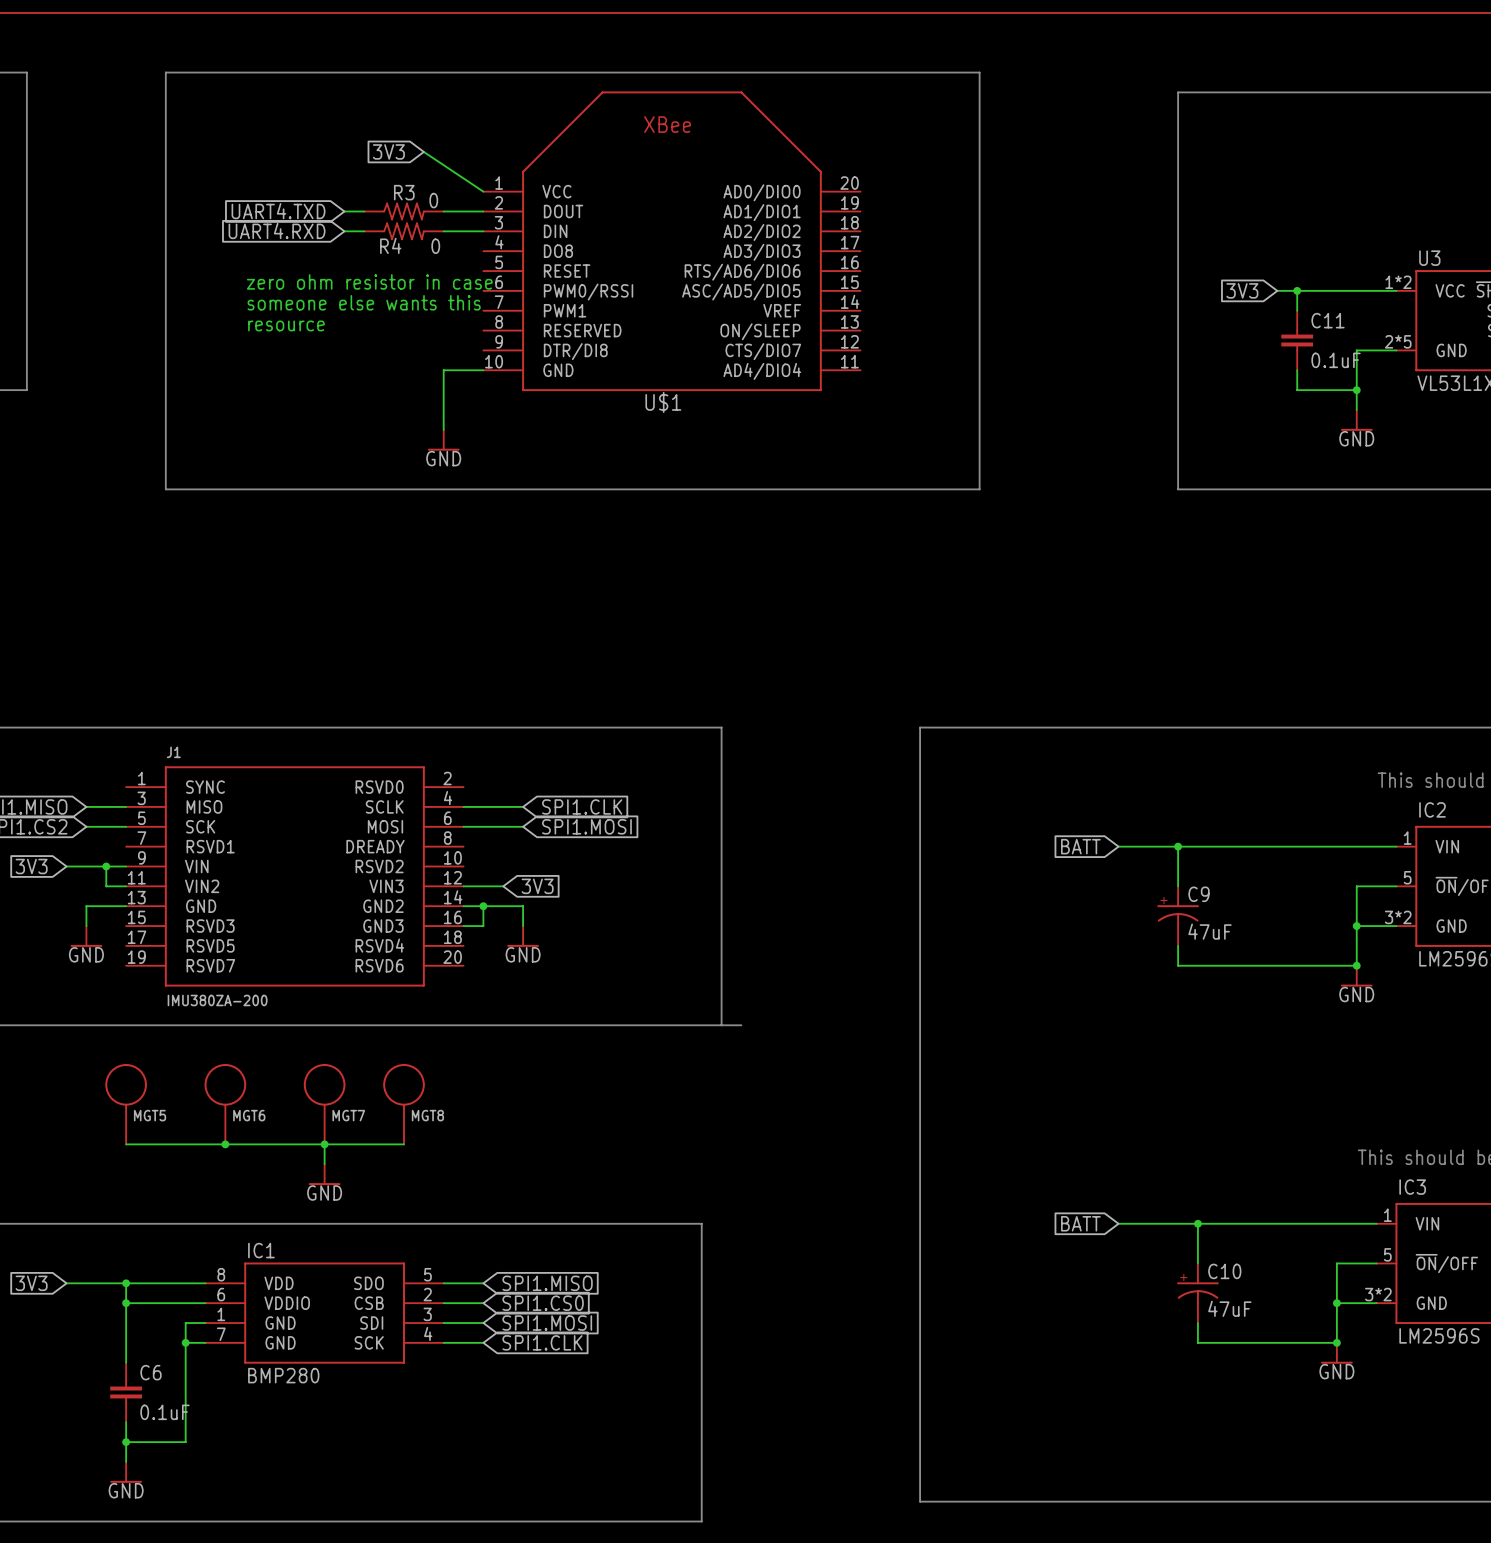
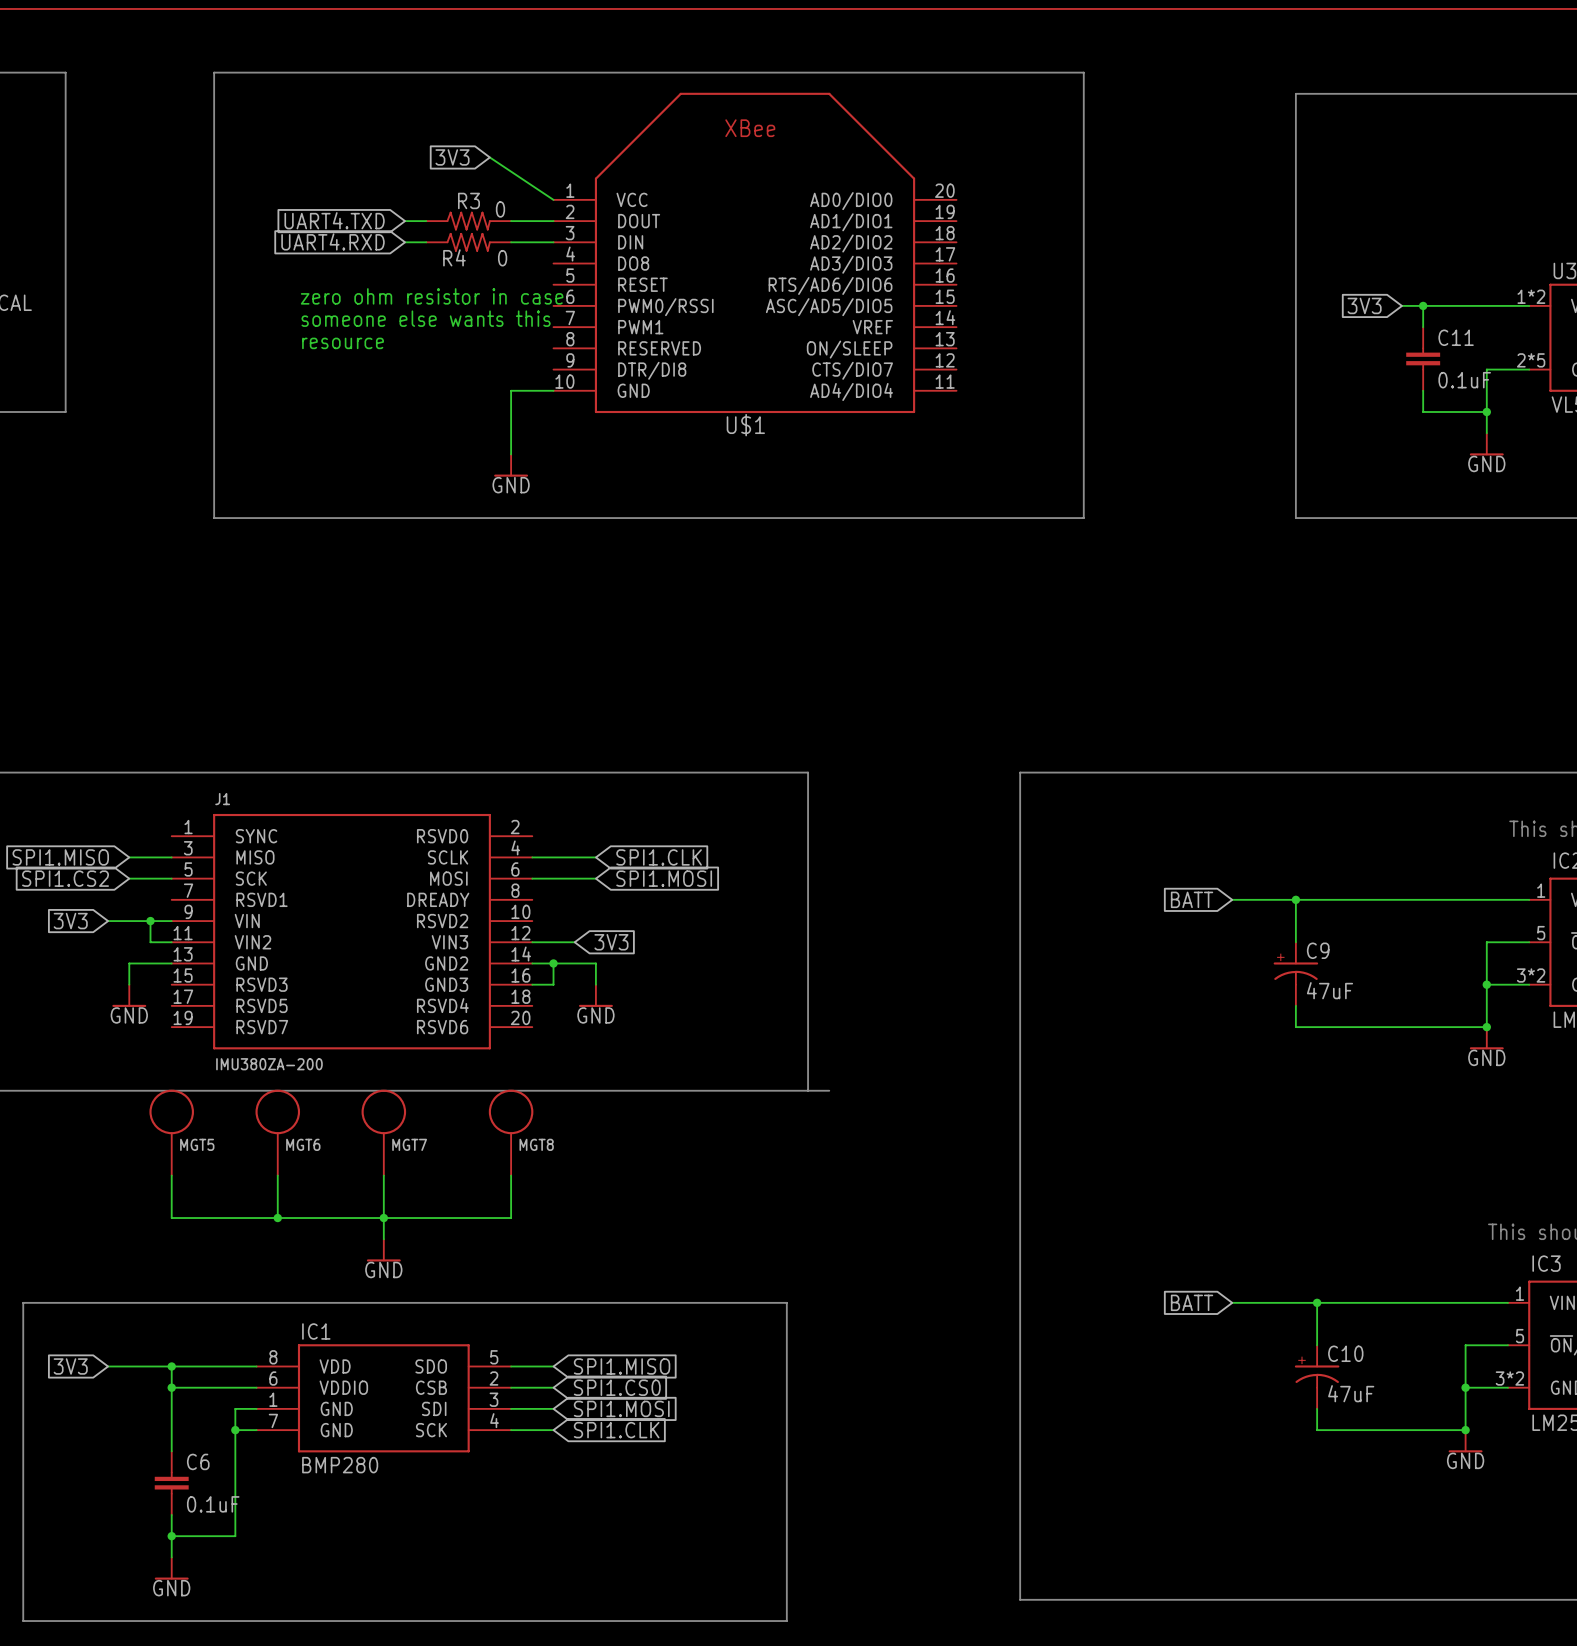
MGT5 position: (126, 1104) -> (171, 1132)
MGT6 position: (225, 1104) -> (277, 1132)
MGT7 position: (324, 1104) -> (383, 1132)
MGT8 position: (404, 1104) -> (511, 1132)
wire: none -> (511, 1175) (511, 1218) (468, 1218)

